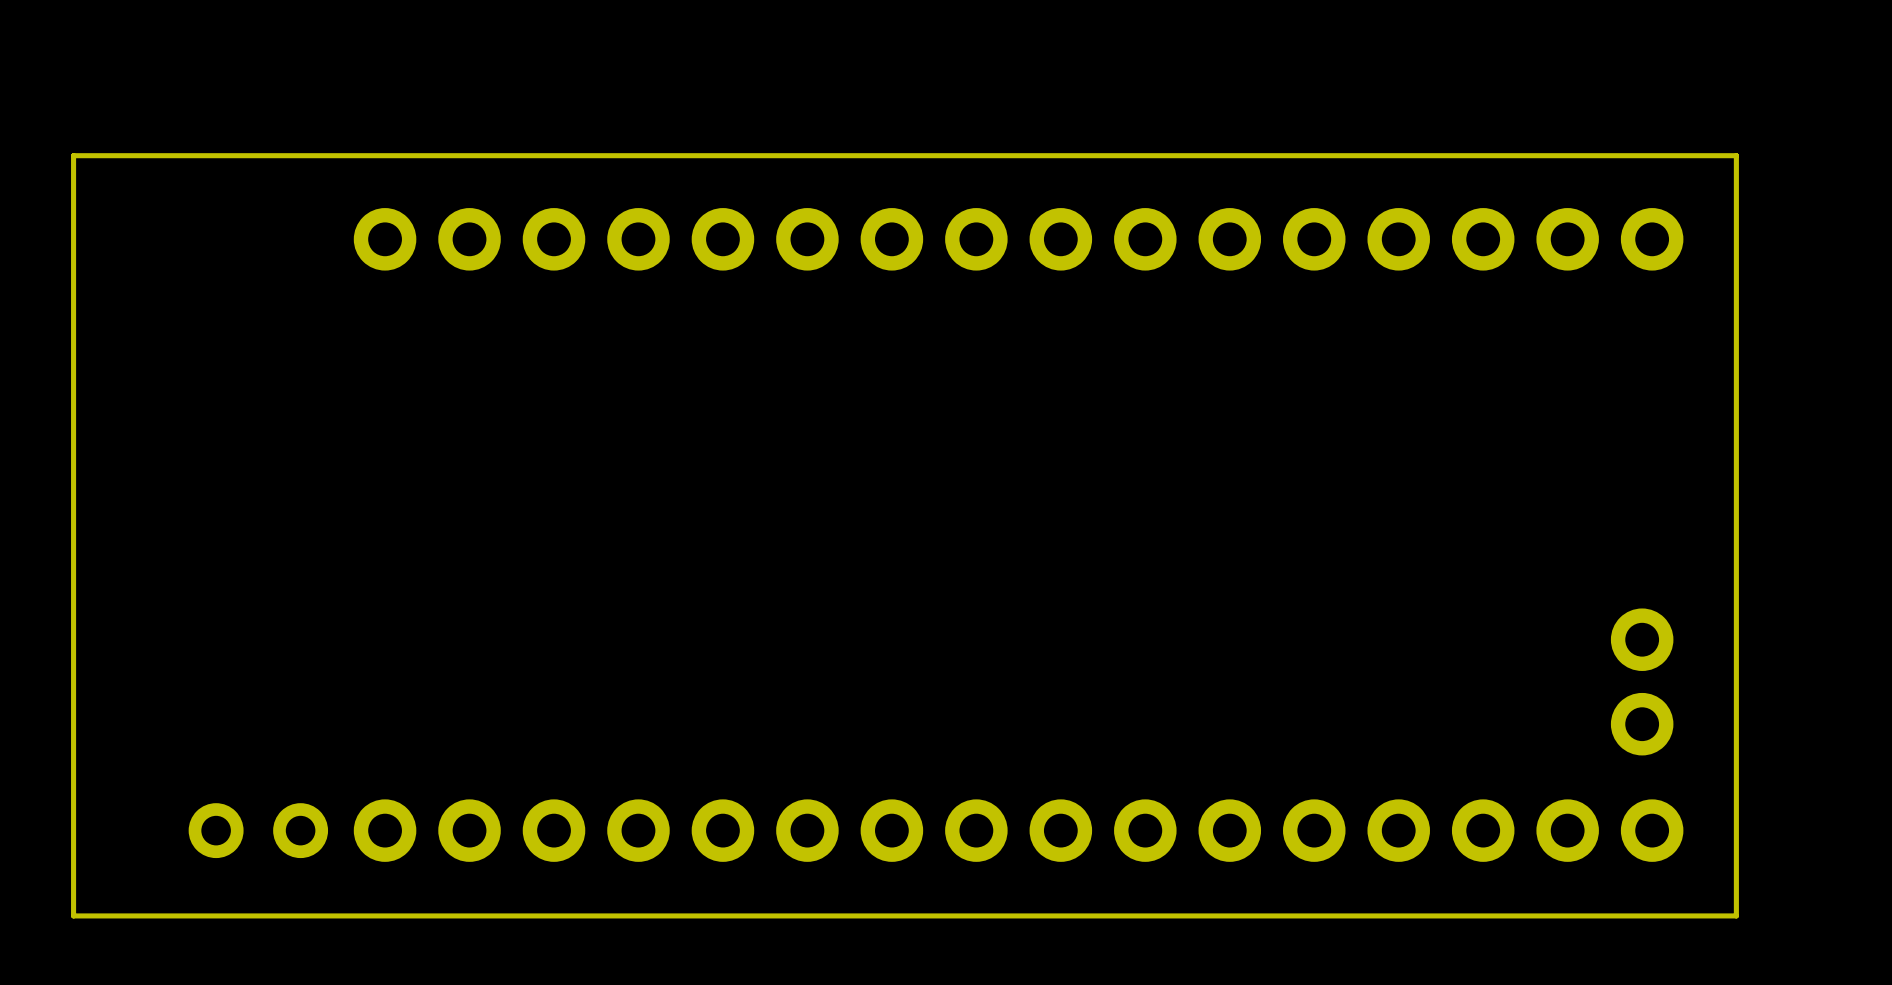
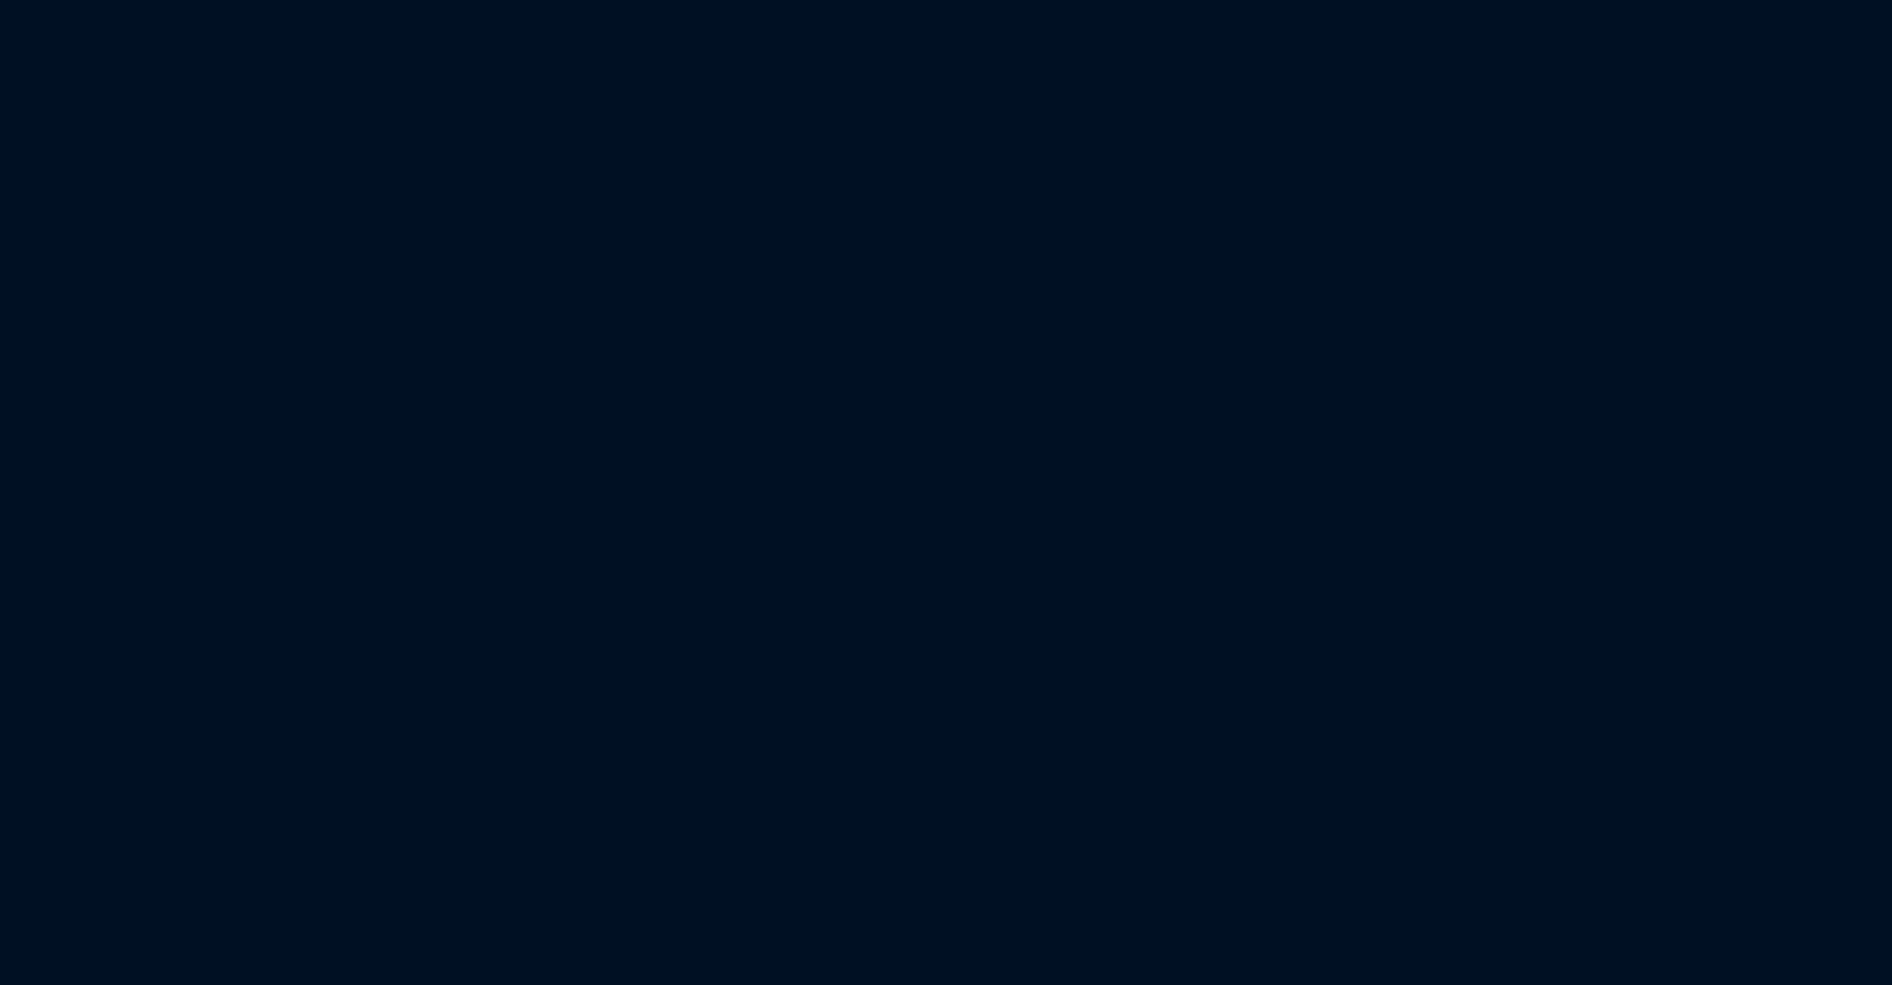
board edge: (1736, 155) (1736, 915) (73, 915) (73, 155) (1736, 155) -> none
part: (1018, 239) -> none
part: (1642, 681) -> none
part: (216, 830) -> none
part: (300, 830) -> none
part: (1018, 830) -> none

